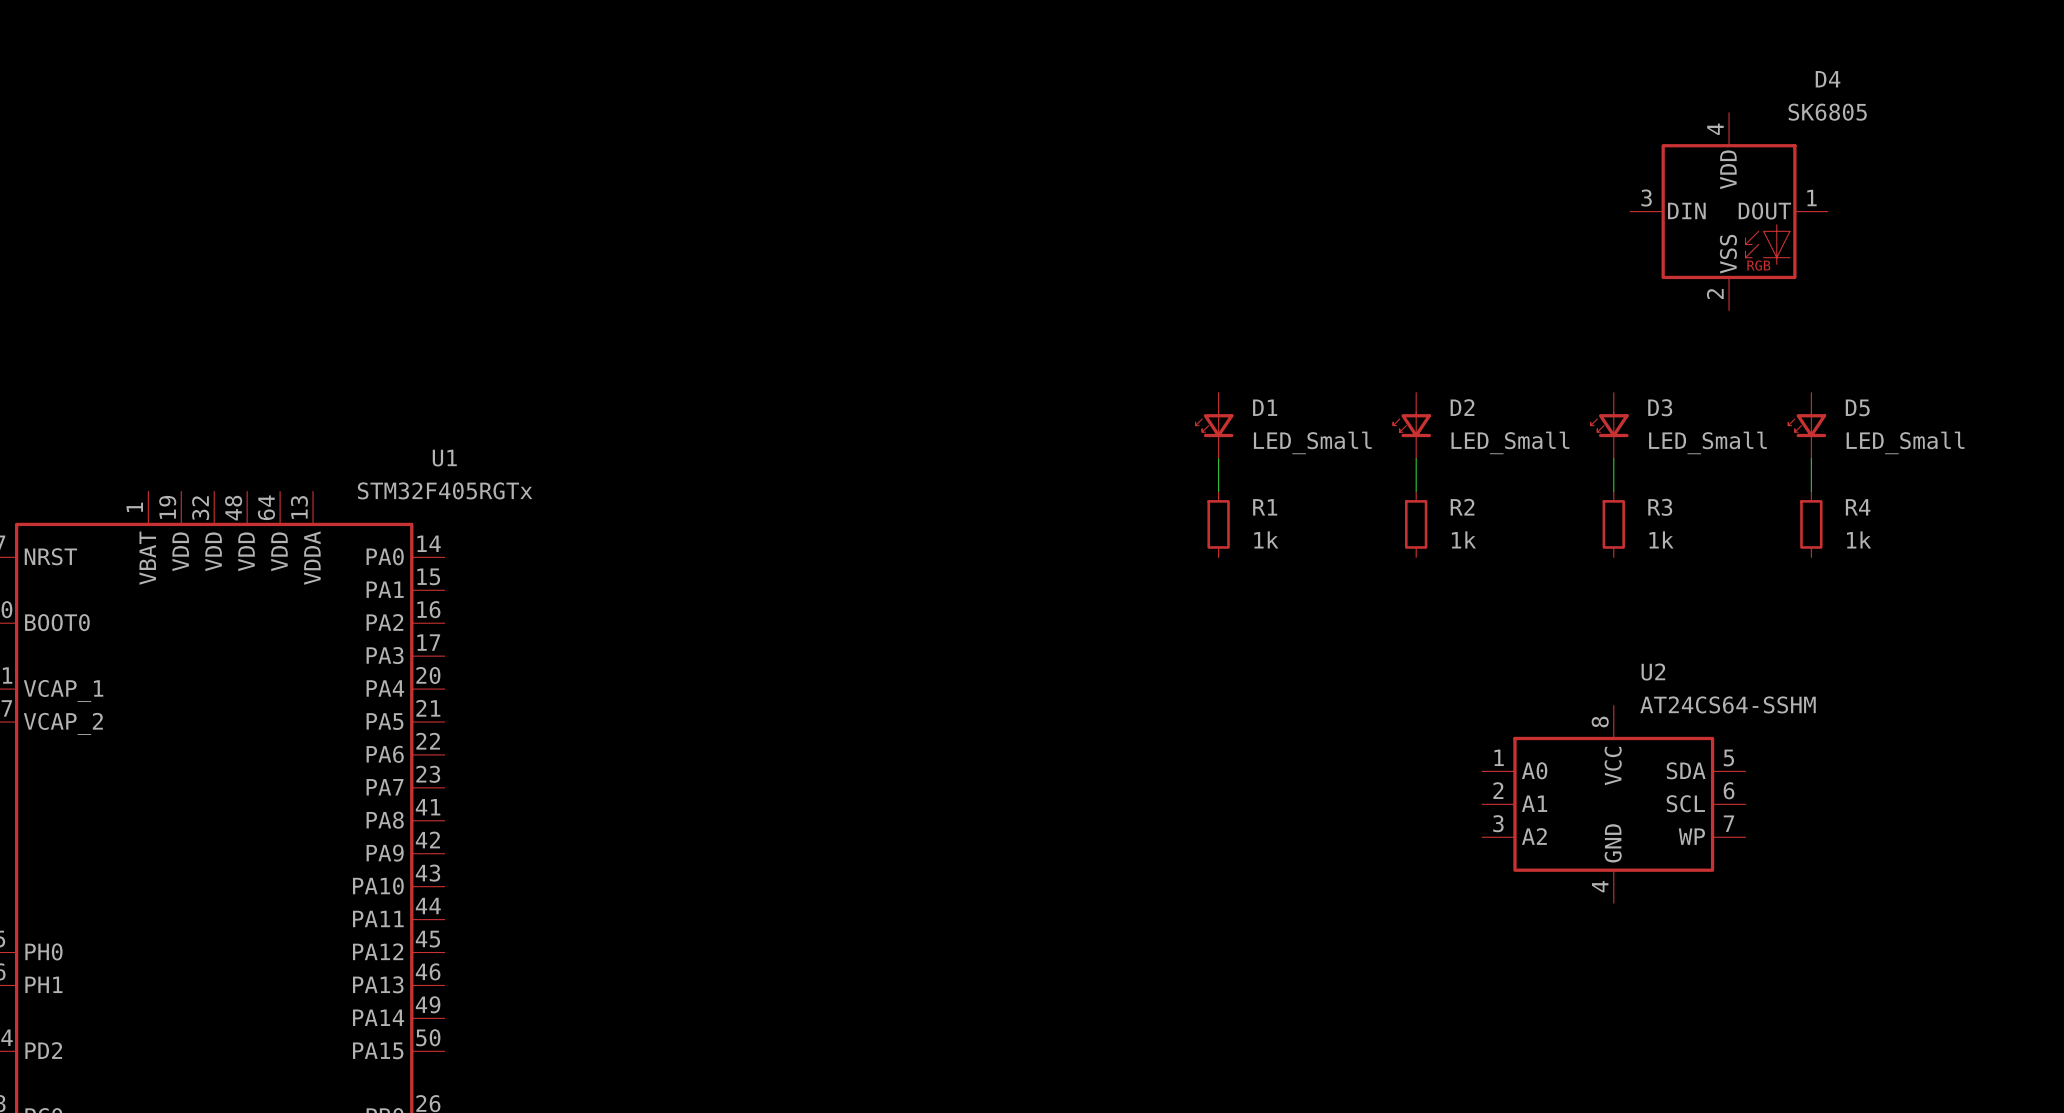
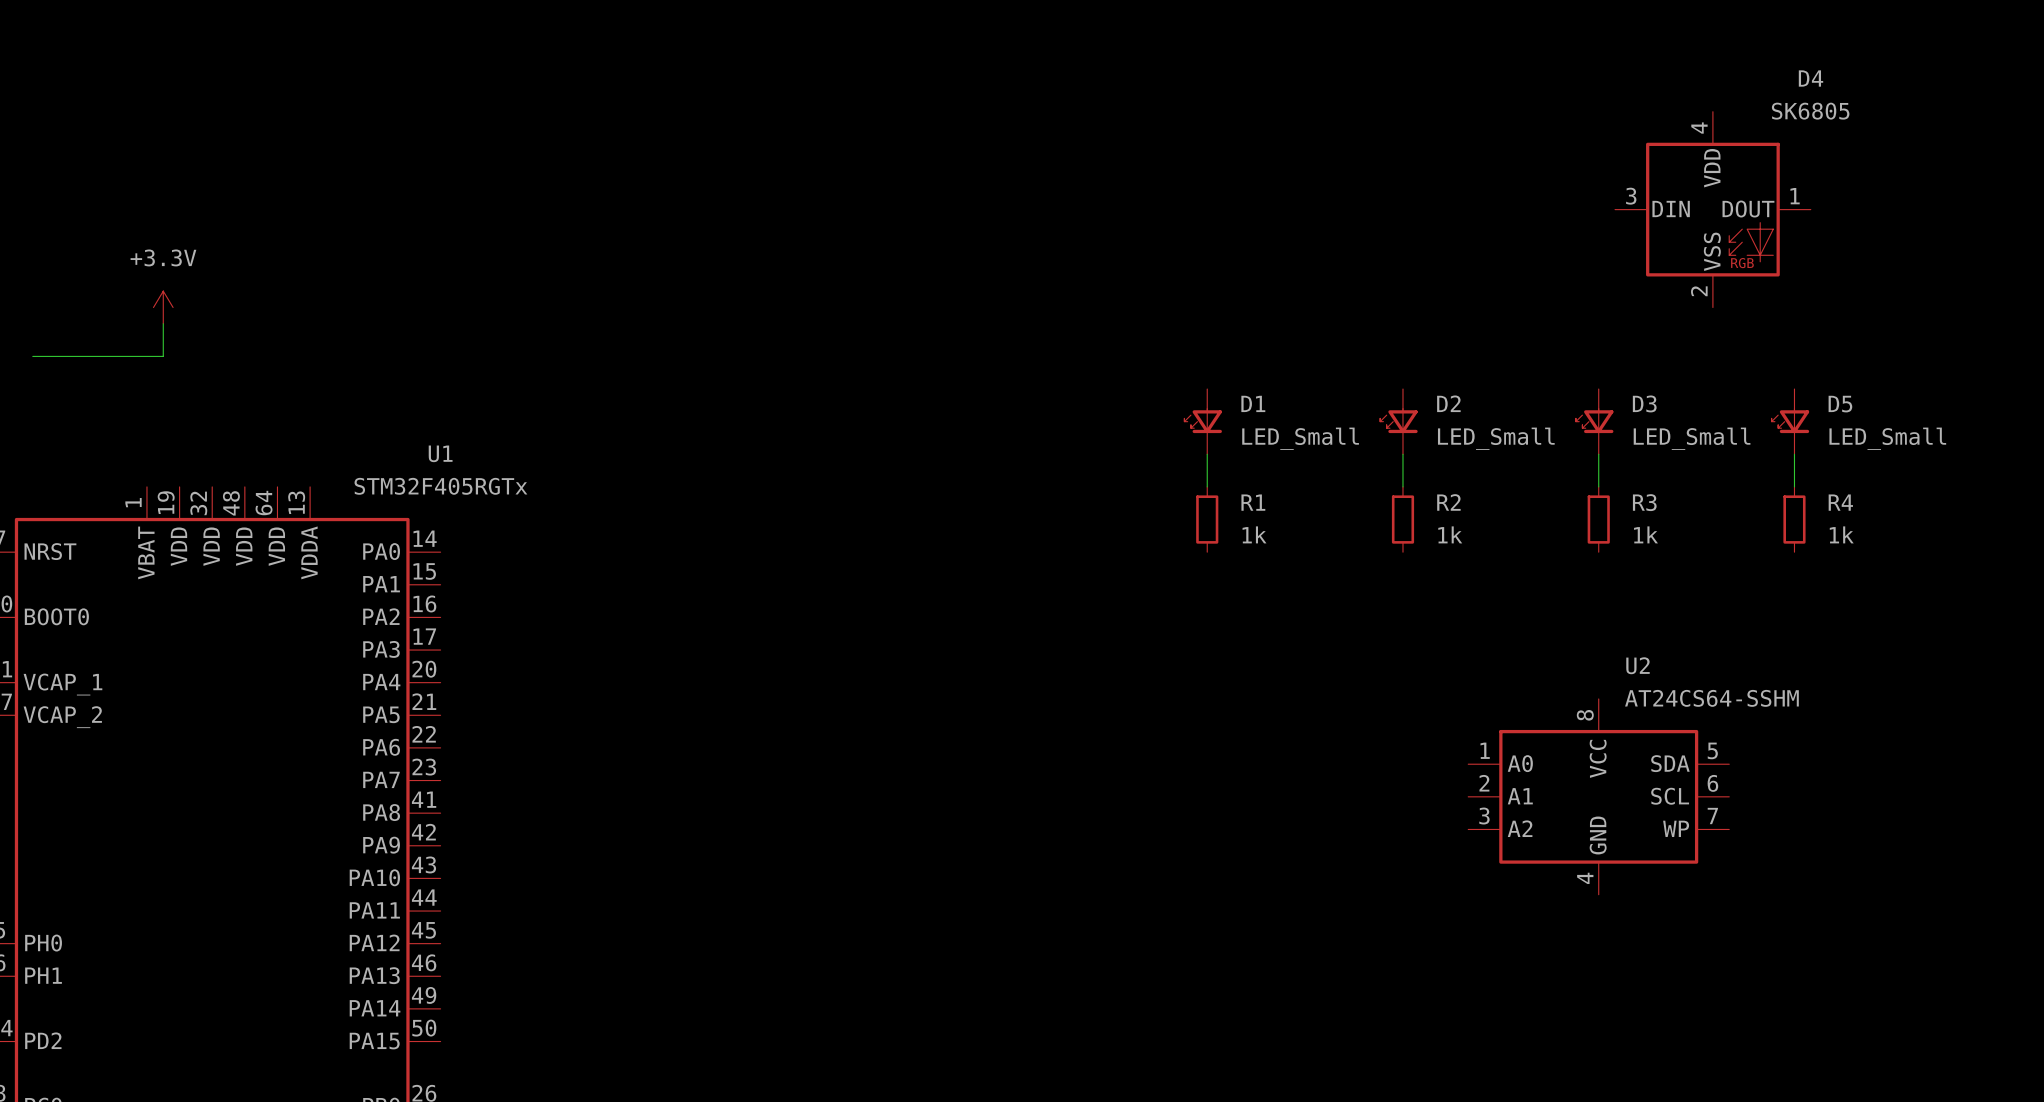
power symbol: none -> +3.3V (163, 307)
wire: none -> (163, 323) (163, 356) (32, 356)

